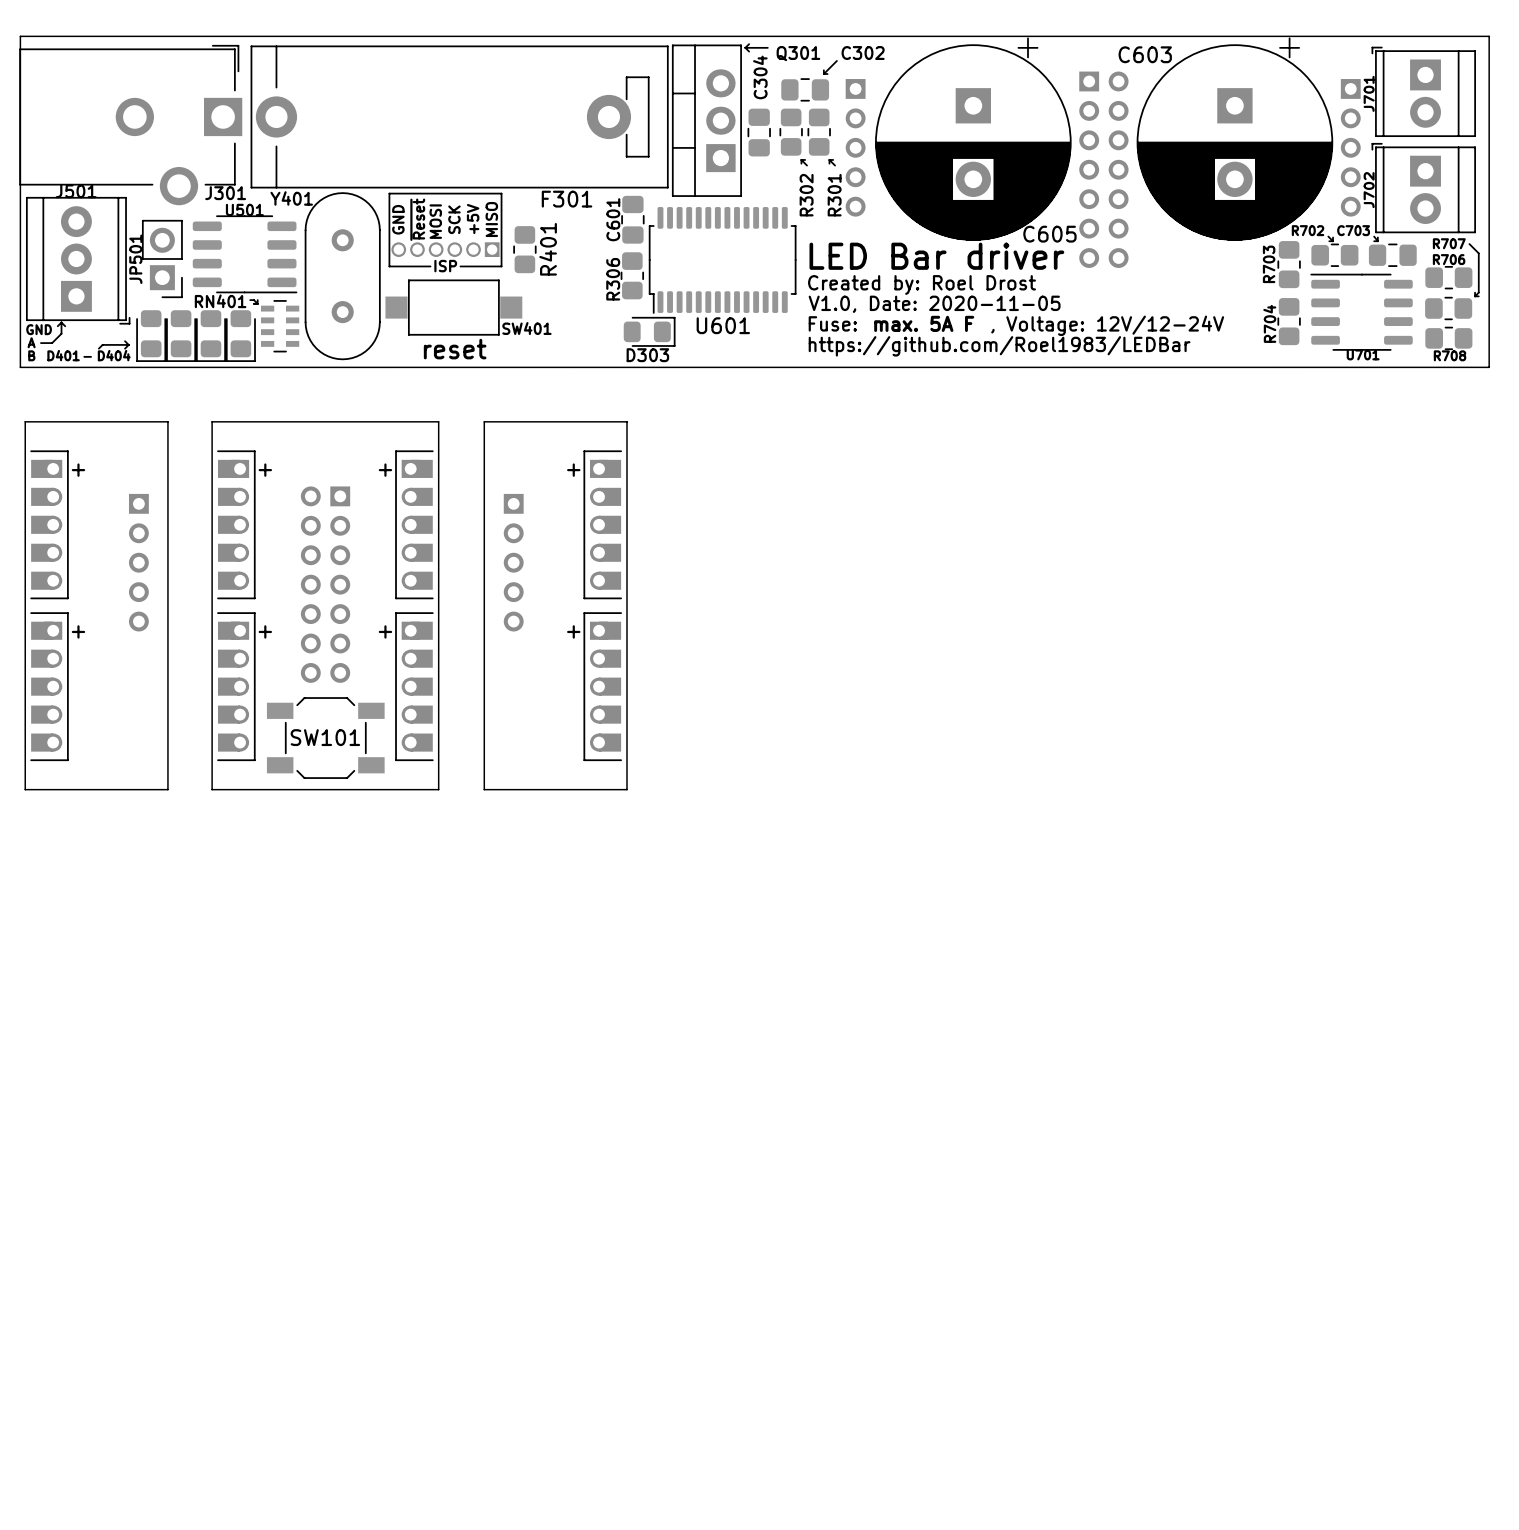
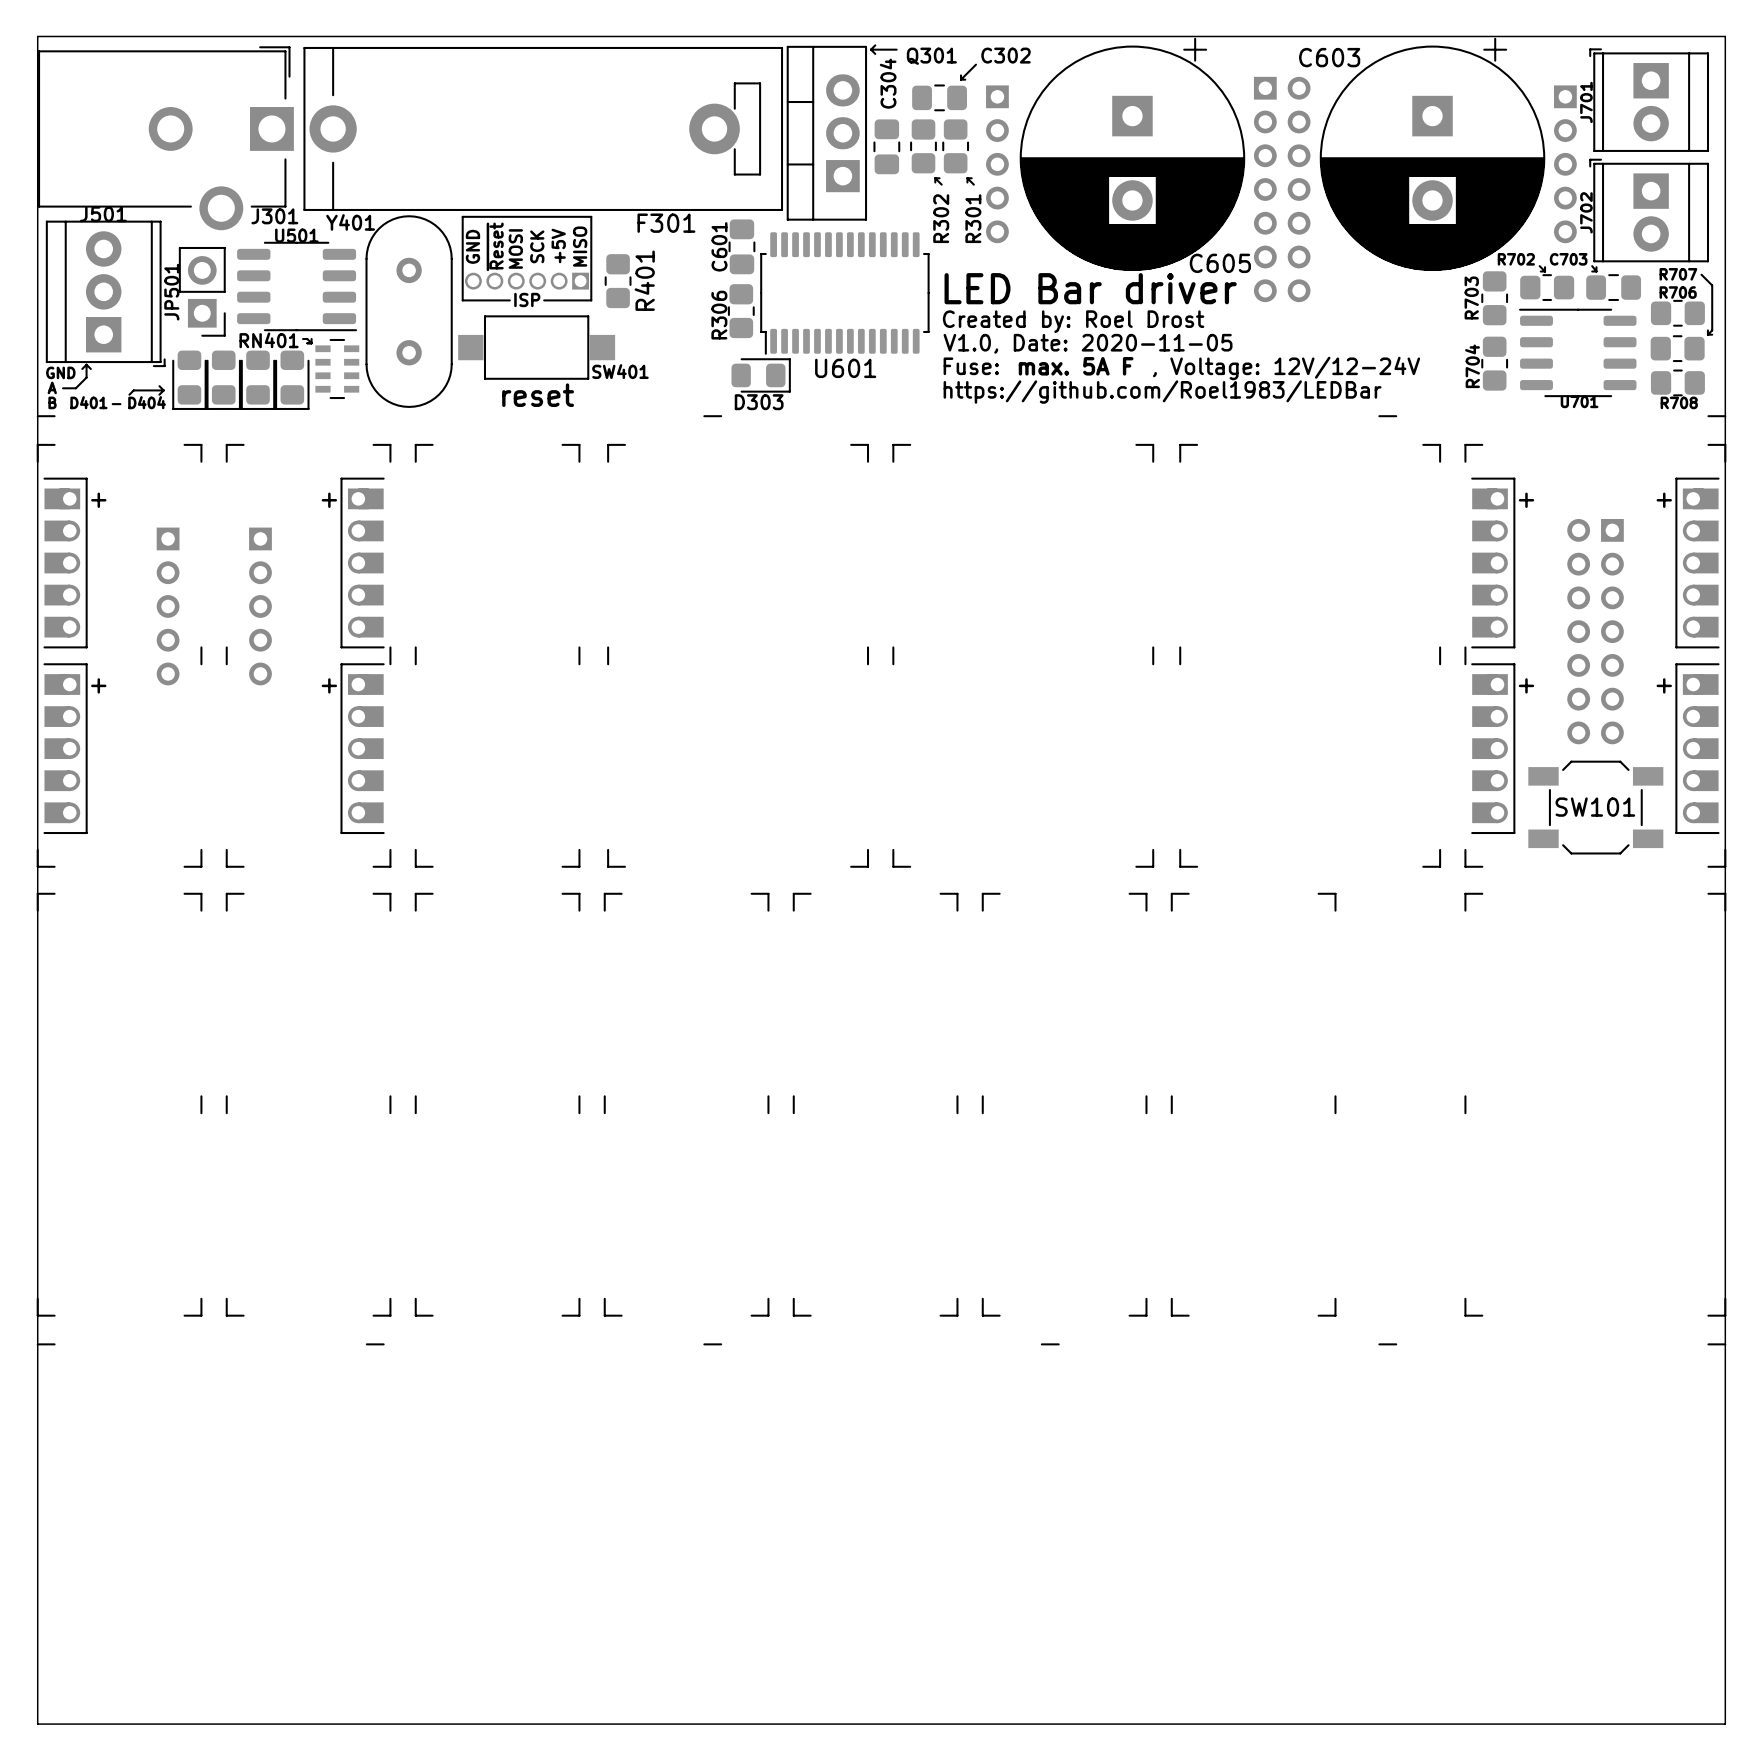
board edge: (20, 36) (20, 367) (1489, 367) (1489, 36) -> (39, 36) (37, 36) (37, 1724) (1725, 1724) (1724, 36)
line: none -> (37, 416) (54, 416)
line: none -> (704, 416) (721, 416)
line: none -> (1379, 416) (1396, 416)
line: none -> (1708, 416) (1725, 416)
line: none -> (54, 444) (37, 444) (37, 461)
line: none -> (184, 444) (201, 444) (201, 461)
line: none -> (243, 444) (226, 444) (226, 461)
line: none -> (373, 444) (390, 444) (390, 461)
line: none -> (432, 444) (415, 444) (415, 461)
line: none -> (562, 444) (579, 444) (579, 461)
line: none -> (625, 444) (608, 444) (608, 461)
line: none -> (851, 444) (868, 444) (868, 461)
line: none -> (910, 444) (893, 444) (893, 461)
line: none -> (1136, 444) (1153, 444) (1153, 461)
line: none -> (1197, 444) (1180, 444) (1180, 461)
line: none -> (1423, 444) (1440, 444) (1440, 461)
line: none -> (1482, 444) (1465, 444) (1465, 461)
line: none -> (1708, 444) (1725, 444) (1725, 461)
board edge: (25, 421) (167, 421) (167, 789) (25, 789) (25, 421) -> none
board edge: (212, 421) (438, 421) (438, 789) (212, 789) (212, 421) -> none
board edge: (484, 421) (484, 789) (627, 789) (627, 421) (484, 421) -> none
part: none -> (362, 563)
part: none -> (1493, 563)
part: none -> (1697, 563)
part position: (49, 524) -> (65, 563)
part: (236, 524) -> none
part: (414, 524) -> none
part: (602, 524) -> none
part: none -> (260, 606)
part: none -> (1595, 631)
part position: (138, 562) -> (168, 606)
part: (513, 562) -> none
line: none -> (201, 647) (201, 664)
line: none -> (226, 647) (226, 664)
line: none -> (390, 647) (390, 664)
line: none -> (415, 647) (415, 664)
line: none -> (579, 647) (579, 664)
line: none -> (608, 647) (608, 664)
line: none -> (868, 647) (868, 664)
line: none -> (893, 647) (893, 664)
line: none -> (1153, 647) (1153, 664)
line: none -> (1180, 647) (1180, 664)
line: none -> (1440, 647) (1440, 664)
line: none -> (1465, 647) (1465, 664)
part: (325, 584) -> none
part: none -> (362, 748)
part: none -> (1493, 748)
part: none -> (1697, 748)
part position: (49, 686) -> (65, 748)
part: (236, 686) -> none
part: (414, 686) -> none
part: (602, 686) -> none
SW101 position: (325, 738) -> (1595, 807)
line: none -> (37, 849) (37, 866) (54, 866)
line: none -> (201, 849) (201, 866) (184, 866)
line: none -> (226, 849) (226, 866) (243, 866)
line: none -> (390, 849) (390, 866) (373, 866)
line: none -> (415, 849) (415, 866) (432, 866)
line: none -> (579, 849) (579, 866) (562, 866)
line: none -> (608, 849) (608, 866) (625, 866)
line: none -> (868, 849) (868, 866) (851, 866)
line: none -> (893, 849) (893, 866) (910, 866)
line: none -> (1153, 849) (1153, 866) (1136, 866)
line: none -> (1180, 849) (1180, 866) (1197, 866)
line: none -> (1440, 849) (1440, 866) (1423, 866)
line: none -> (1465, 849) (1465, 866) (1482, 866)
line: none -> (1725, 849) (1725, 866) (1708, 866)
line: none -> (54, 893) (37, 893) (37, 910)
line: none -> (184, 893) (201, 893) (201, 910)
line: none -> (243, 893) (226, 893) (226, 910)
line: none -> (373, 893) (390, 893) (390, 910)
line: none -> (432, 893) (415, 893) (415, 910)
line: none -> (562, 893) (579, 893) (579, 910)
line: none -> (621, 893) (604, 893) (604, 910)
line: none -> (751, 893) (768, 893) (768, 910)
line: none -> (810, 893) (793, 893) (793, 910)
line: none -> (940, 893) (957, 893) (957, 910)
line: none -> (999, 893) (982, 893) (982, 910)
line: none -> (1129, 893) (1146, 893) (1146, 910)
line: none -> (1188, 893) (1171, 893) (1171, 910)
line: none -> (1318, 893) (1335, 893) (1335, 910)
line: none -> (1482, 893) (1465, 893) (1465, 910)
line: none -> (1708, 893) (1725, 893) (1725, 910)
line: none -> (201, 1096) (201, 1113)
line: none -> (226, 1096) (226, 1113)
line: none -> (390, 1096) (390, 1113)
line: none -> (415, 1096) (415, 1113)
line: none -> (579, 1096) (579, 1113)
line: none -> (604, 1096) (604, 1113)
line: none -> (768, 1096) (768, 1113)
line: none -> (793, 1096) (793, 1113)
line: none -> (957, 1096) (957, 1113)
line: none -> (982, 1096) (982, 1113)
line: none -> (1146, 1096) (1146, 1113)
line: none -> (1171, 1096) (1171, 1113)
line: none -> (1335, 1096) (1335, 1113)
line: none -> (1465, 1096) (1465, 1113)
line: none -> (37, 1298) (37, 1315) (54, 1315)
line: none -> (201, 1298) (201, 1315) (184, 1315)
line: none -> (226, 1298) (226, 1315) (243, 1315)
line: none -> (390, 1298) (390, 1315) (373, 1315)
line: none -> (415, 1298) (415, 1315) (432, 1315)
line: none -> (579, 1298) (579, 1315) (562, 1315)
line: none -> (604, 1298) (604, 1315) (621, 1315)
line: none -> (768, 1298) (768, 1315) (751, 1315)
line: none -> (793, 1298) (793, 1315) (810, 1315)
line: none -> (957, 1298) (957, 1315) (940, 1315)
line: none -> (982, 1298) (982, 1315) (999, 1315)
line: none -> (1146, 1298) (1146, 1315) (1129, 1315)
line: none -> (1171, 1298) (1171, 1315) (1188, 1315)
line: none -> (1335, 1298) (1335, 1315) (1318, 1315)
line: none -> (1465, 1298) (1465, 1315) (1482, 1315)
line: none -> (1725, 1298) (1725, 1315) (1708, 1315)
line: none -> (37, 1344) (54, 1344)
line: none -> (366, 1344) (383, 1344)
line: none -> (704, 1344) (721, 1344)
line: none -> (1041, 1344) (1058, 1344)
line: none -> (1379, 1344) (1396, 1344)
line: none -> (1708, 1344) (1725, 1344)

